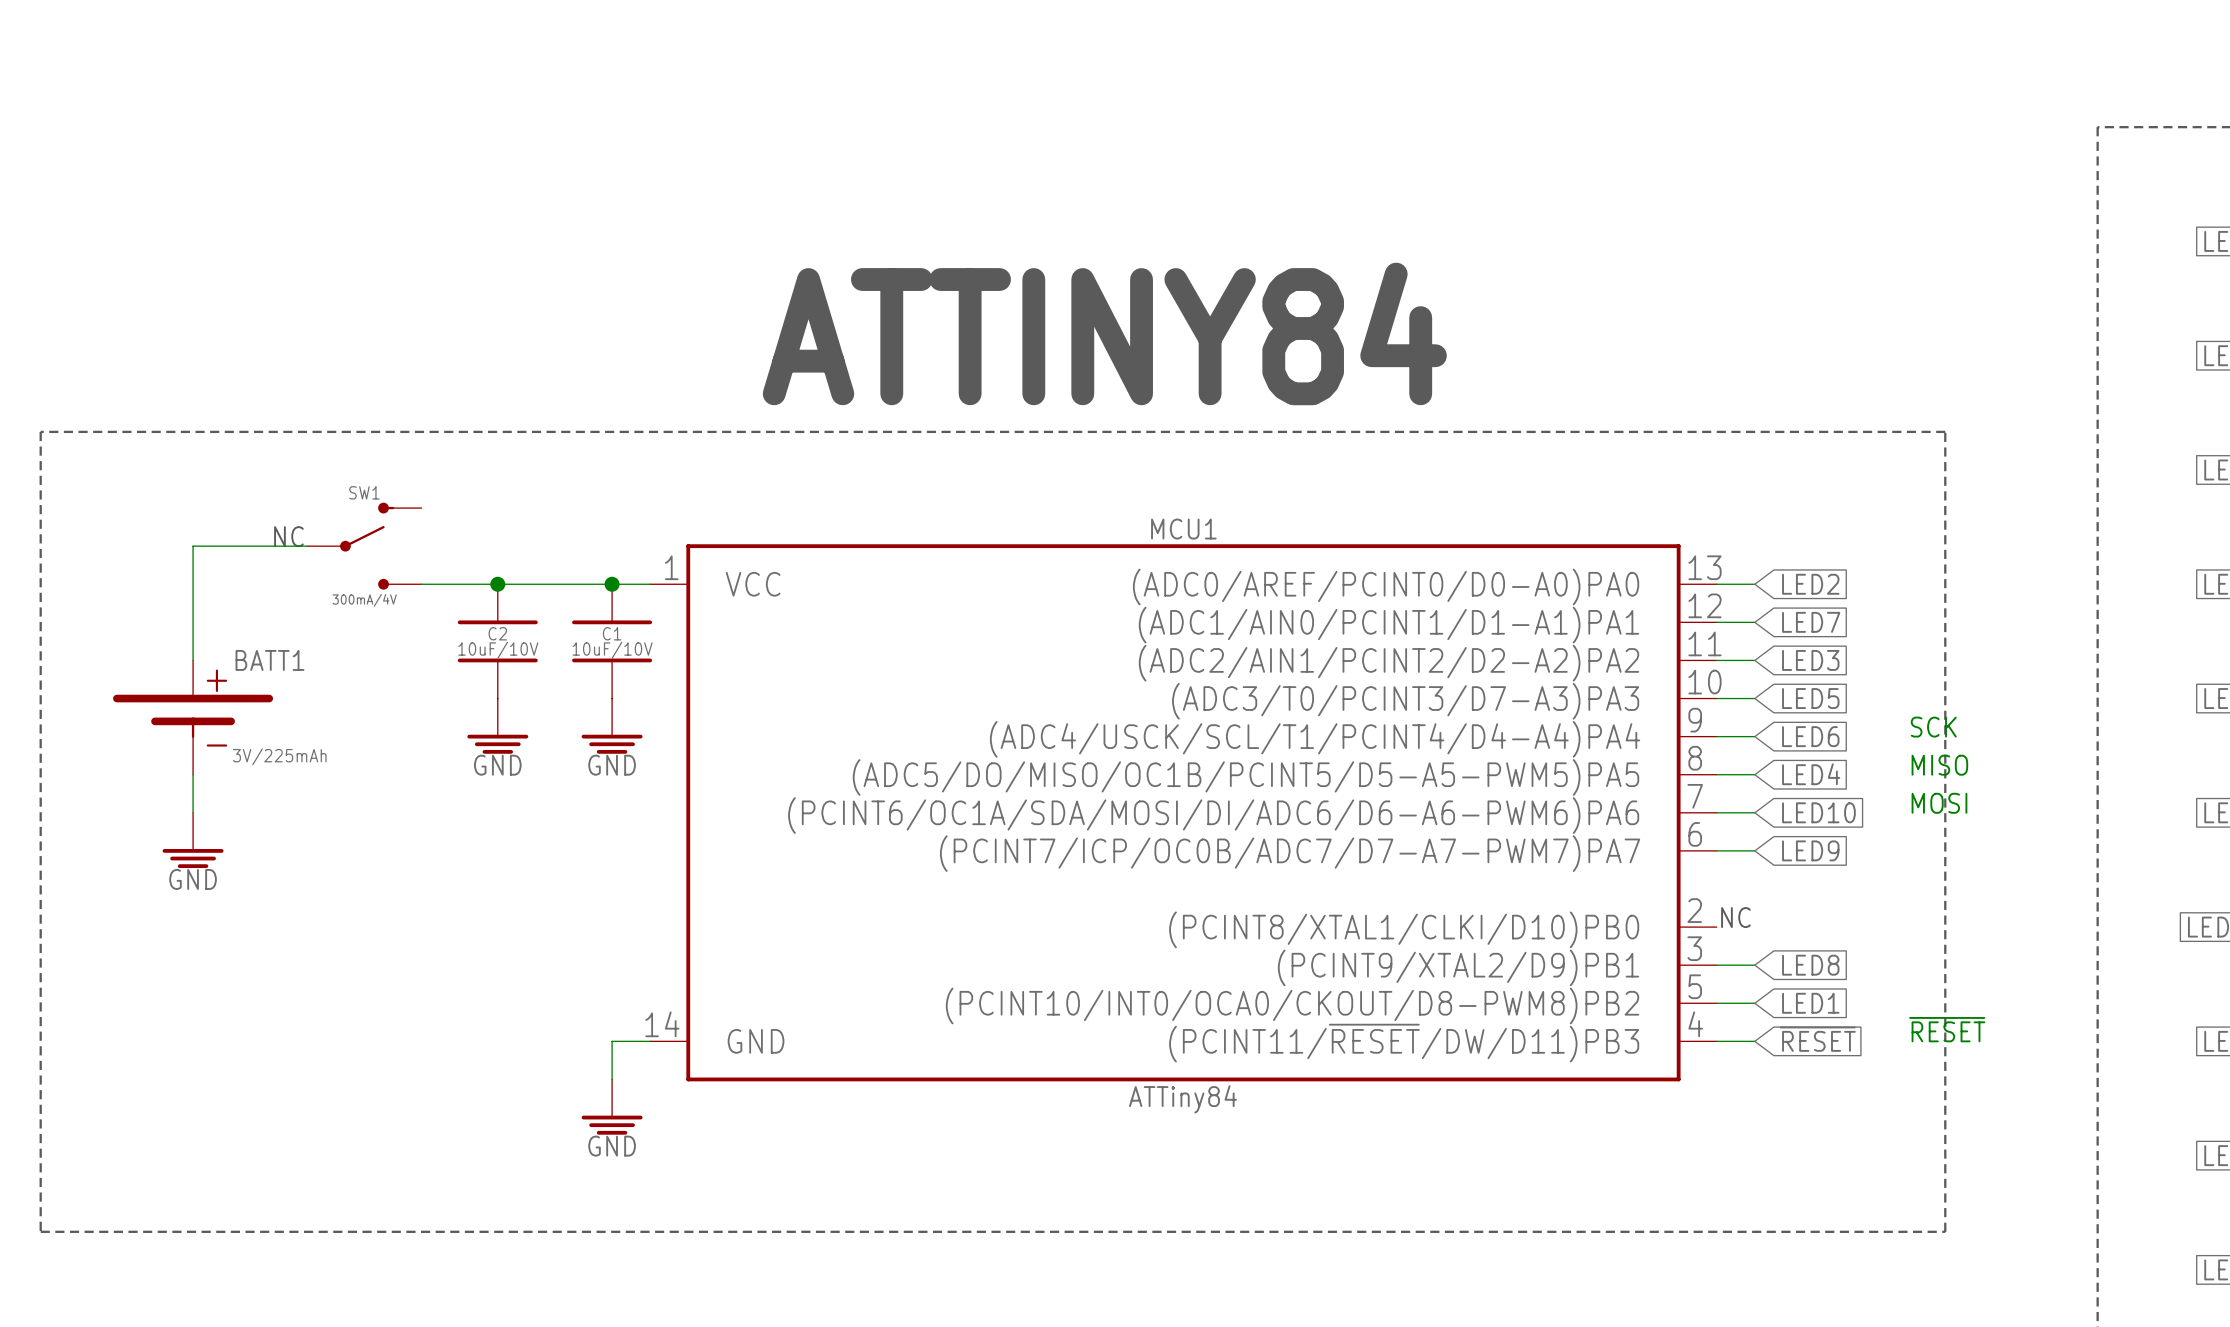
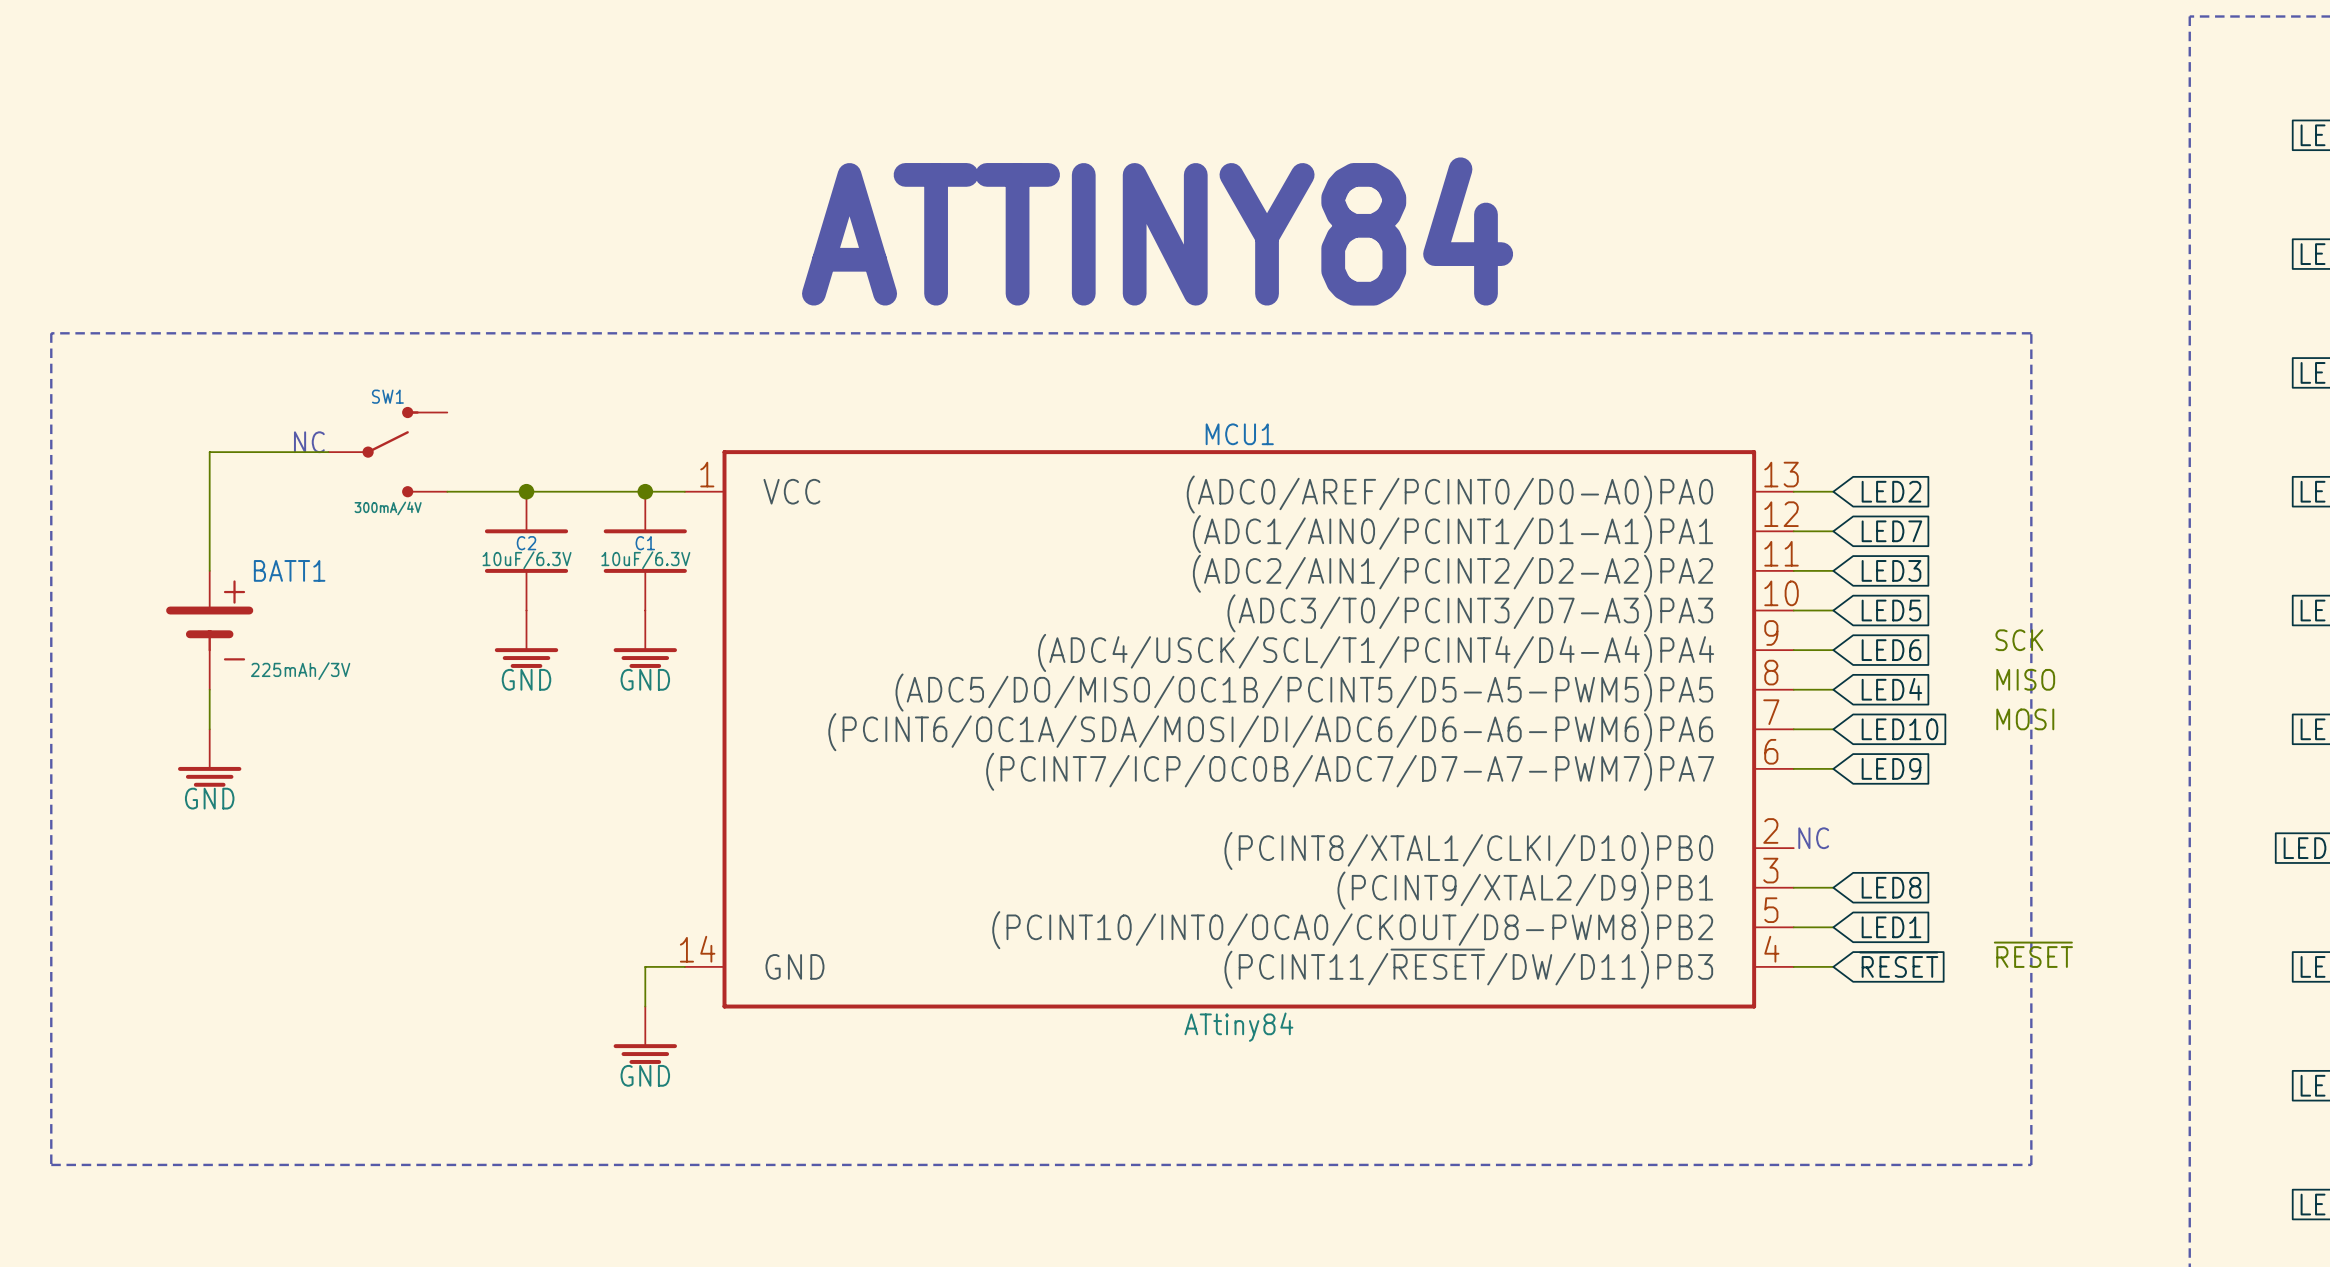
C2 value: 10uF/10V (498, 650) -> 10uF/6.3V (527, 560)
C1 value: 10uF/10V (612, 650) -> 10uF/6.3V (645, 560)
BATT1 symbol: [113, 660, 274, 775] -> [166, 570, 254, 690]
BATT1 value: 3V/225mAh (279, 756) -> 225mAh/3V (300, 671)
MCU1 value: ATTiny84 (1183, 1099) -> ATtiny84 (1238, 1027)

